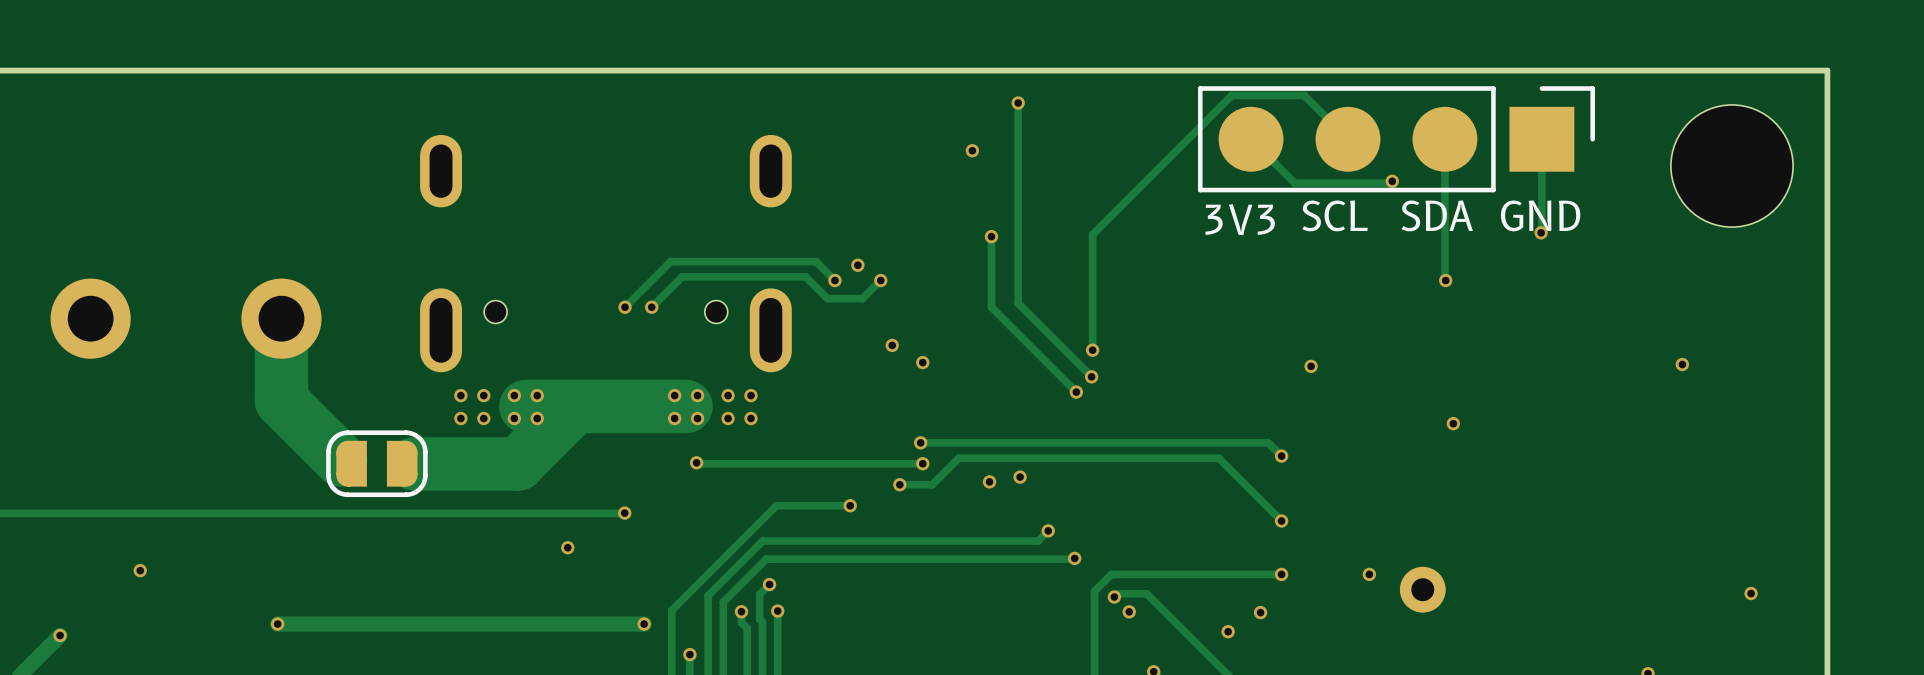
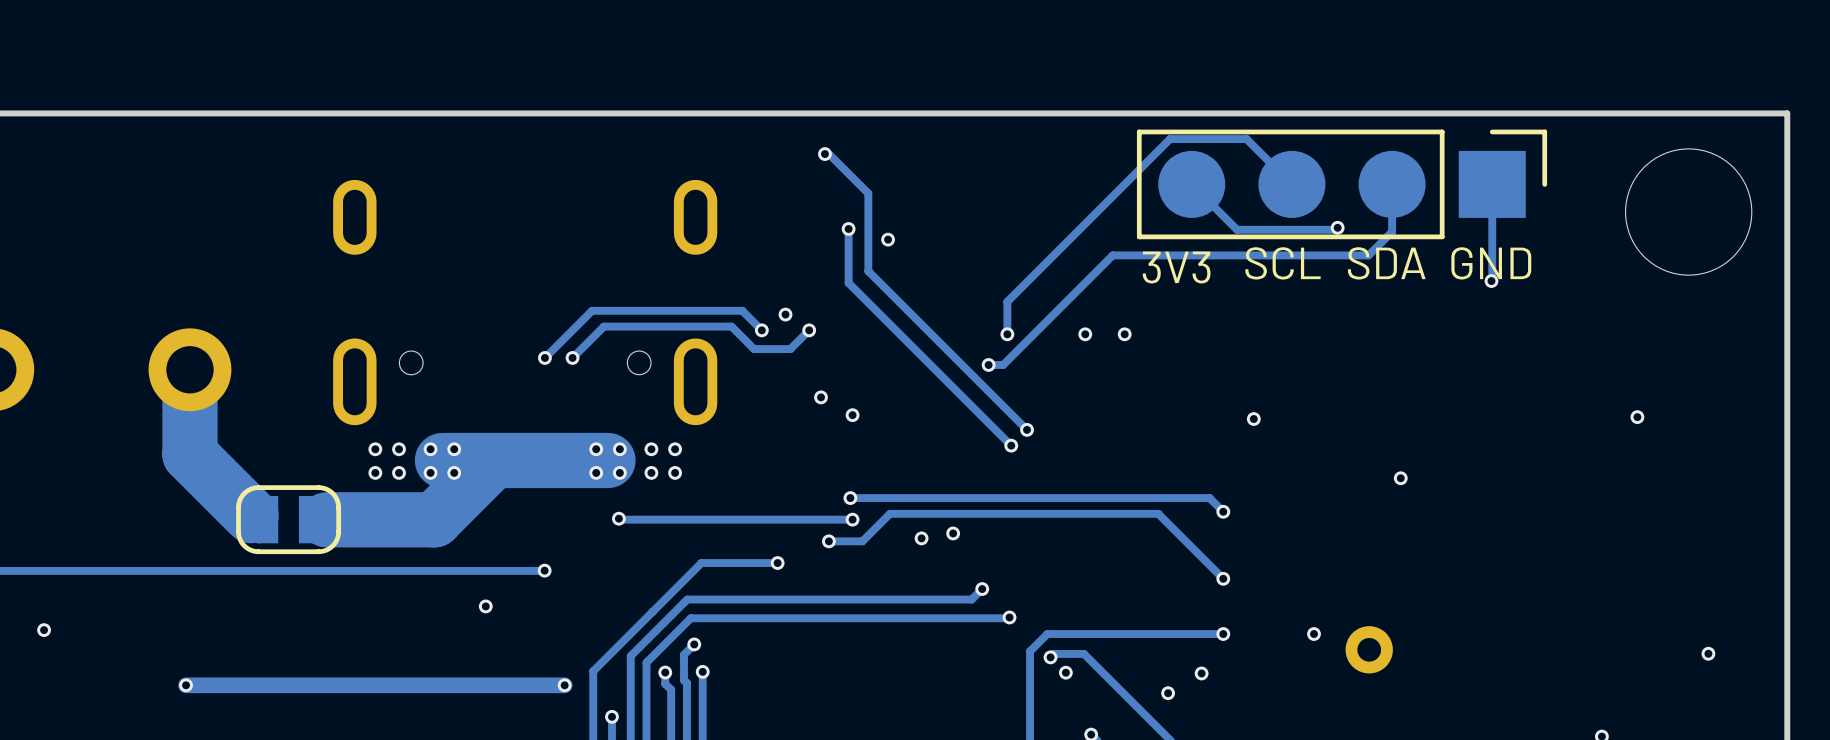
track: (1231, 95) (1092, 234) (1092, 350) -> (1172, 139) (1007, 301) (1007, 334)
track: (1018, 103) (1018, 303) -> (824, 154) (828, 154) (868, 193) (868, 271) (951, 354)
via: (1018, 103) -> none
via: none -> (824, 154)
via: (972, 150) -> none
via: none -> (848, 228)
track: (1444, 185) (1445, 280) -> (1392, 231) (1368, 255) (1112, 255) (1003, 364) (988, 364)
via: none -> (888, 239)
track: (991, 236) (991, 307) -> (848, 228) (848, 283) (923, 357)
via: (991, 236) -> none
via: (1445, 280) -> none
via: none -> (1007, 334)
via: none -> (1085, 334)
via: none -> (1124, 334)
via: none -> (988, 364)
via: (1092, 350) -> none

